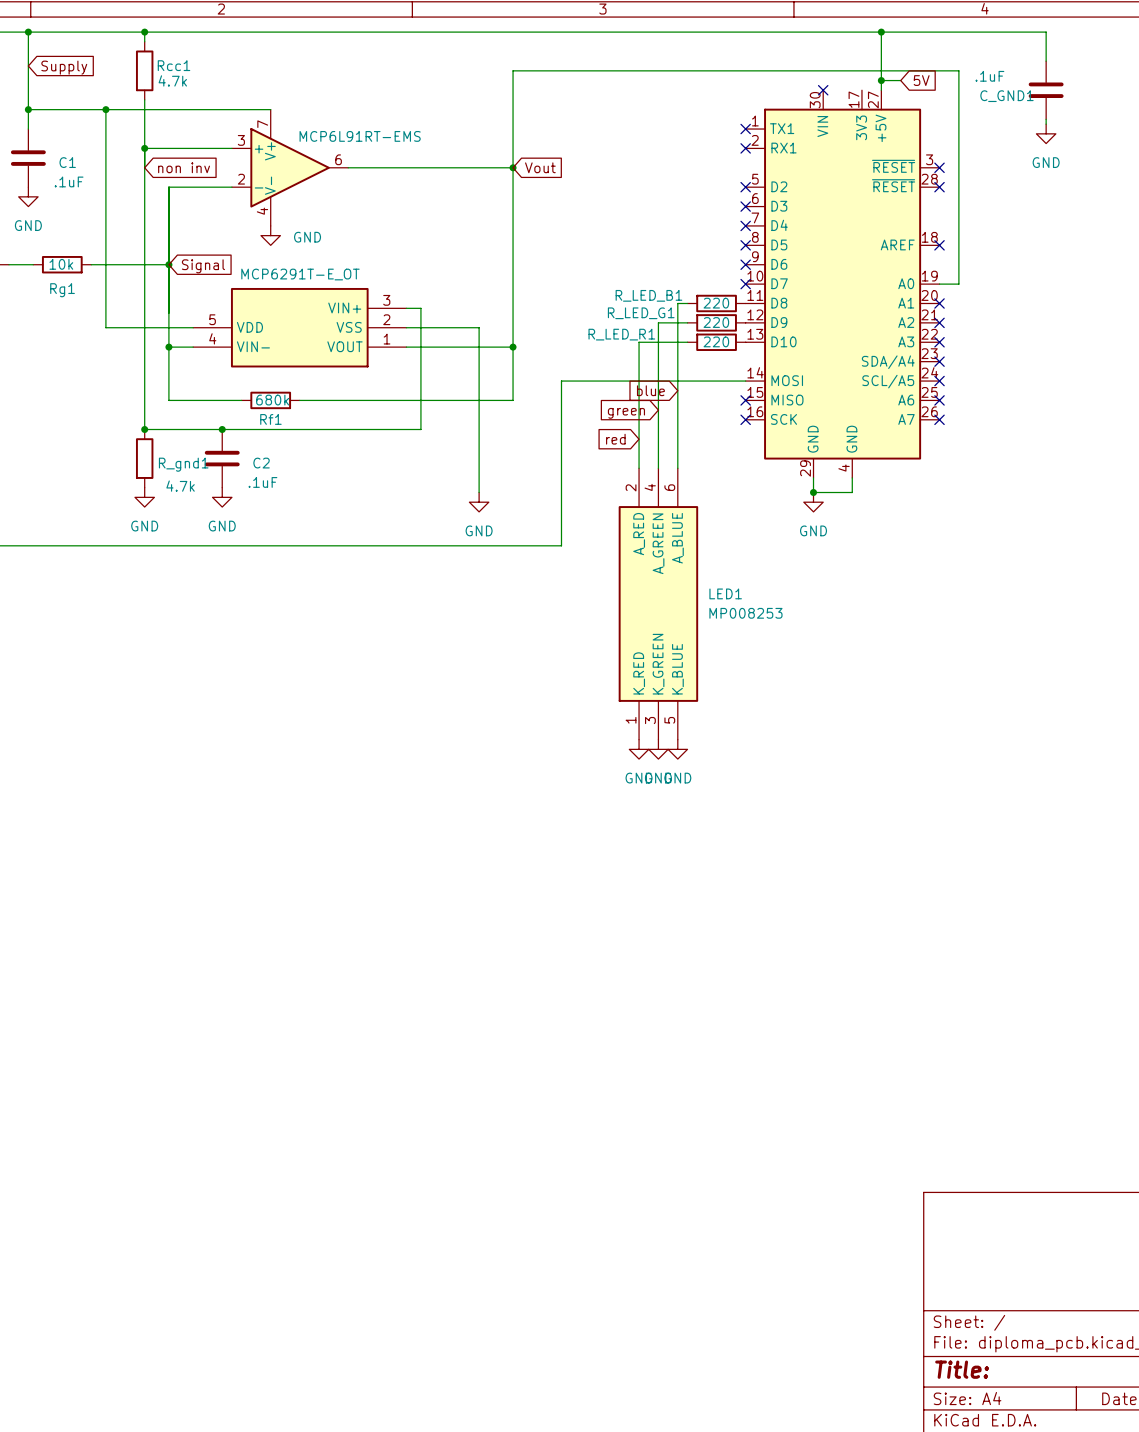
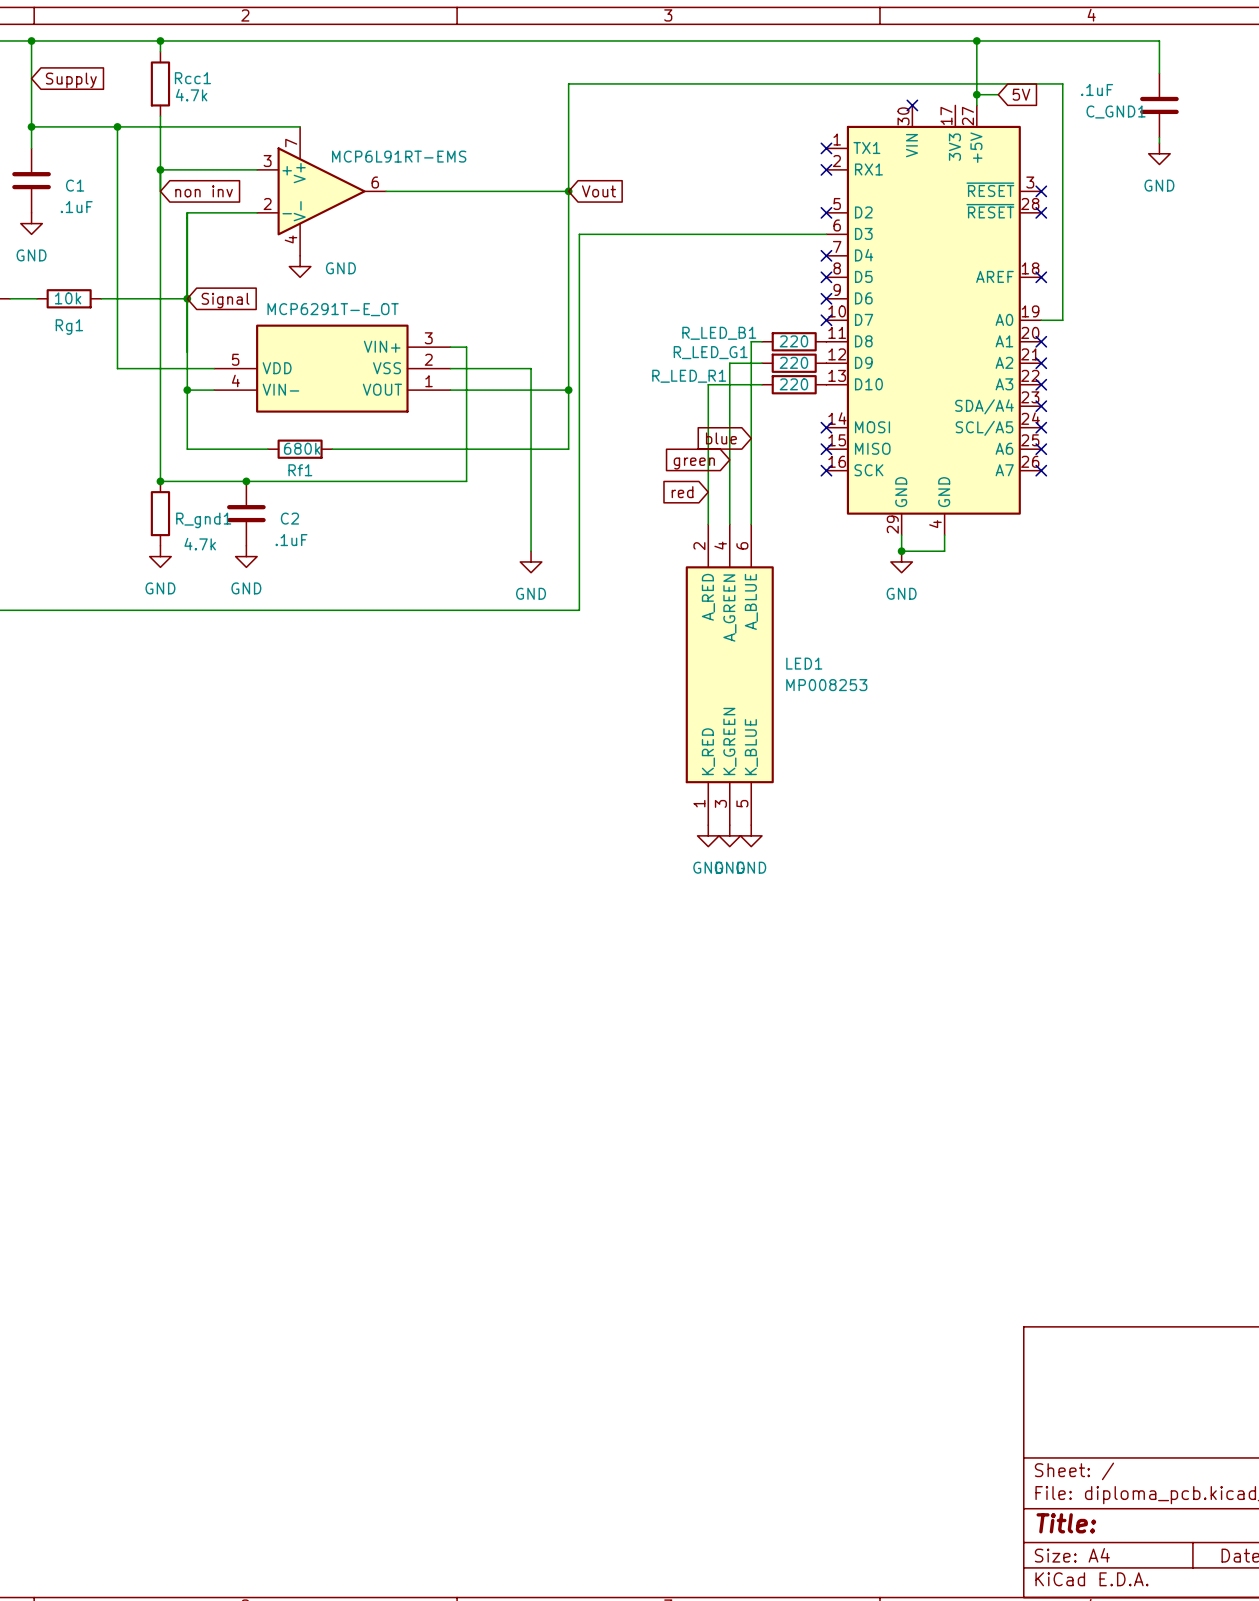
no-connect mark: (745, 206) -> none
wire: (745, 381) (561, 381) (561, 545) (522, 545) -> (826, 234) (579, 234) (579, 610)
no-connect mark: none -> (826, 427)

